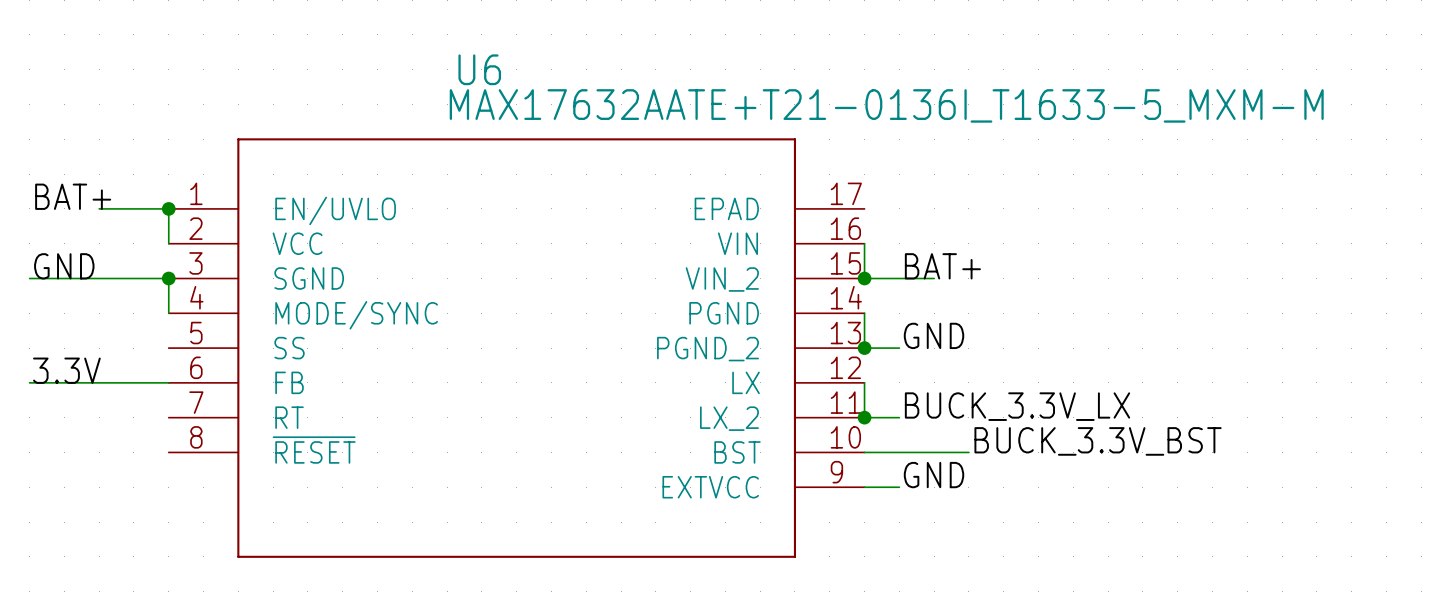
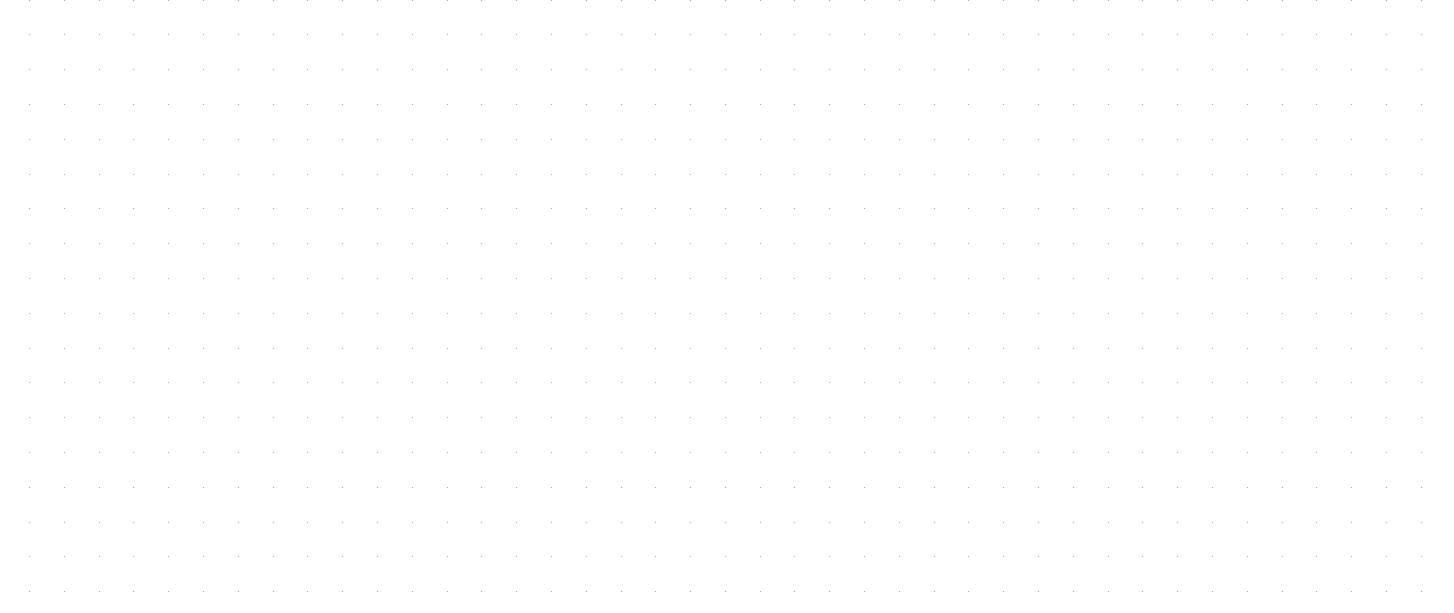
label: BAT+ (73, 196) -> none
wire: (99, 208) (168, 208) (168, 243) -> none
junction: (168, 208) -> none
wire: (864, 243) (864, 278) (934, 278) -> none
label: GND (64, 266) -> none
label: BAT+ (942, 266) -> none
wire: (29, 278) (168, 278) (168, 313) -> none
junction: (168, 278) -> none
junction: (864, 278) -> none
wire: (864, 313) (864, 348) (899, 348) -> none
label: GND (934, 335) -> none
U6: MAX17632AATE+T21-0136I_T1633-5_MXM-M (516, 348) -> none
junction: (864, 348) -> none
label: 3.3V (66, 370) -> none
wire: (29, 382) (168, 382) -> none
wire: (864, 382) (864, 417) (899, 417) -> none
label: BUCK_3.3V_LX (1017, 406) -> none
junction: (864, 417) -> none
label: BUCK_3.3V_BST (1098, 441) -> none
wire: (864, 452) (968, 452) -> none
label: GND (934, 475) -> none
wire: (864, 487) (899, 487) -> none

